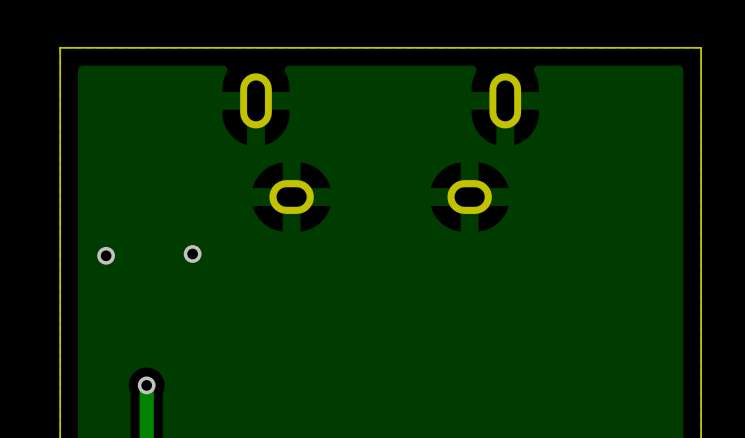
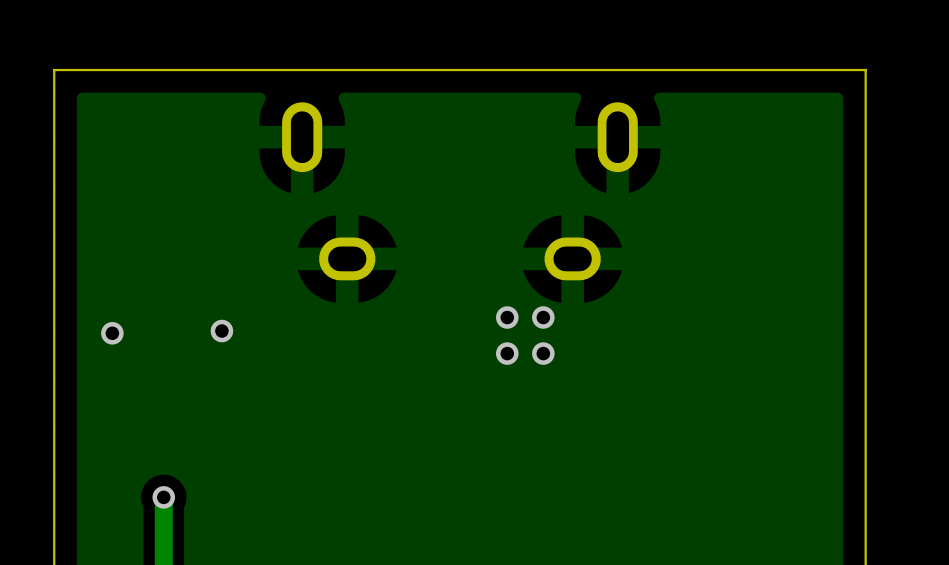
via: none -> (507, 317)
via: none -> (543, 317)
via: none -> (507, 353)
via: none -> (543, 353)

